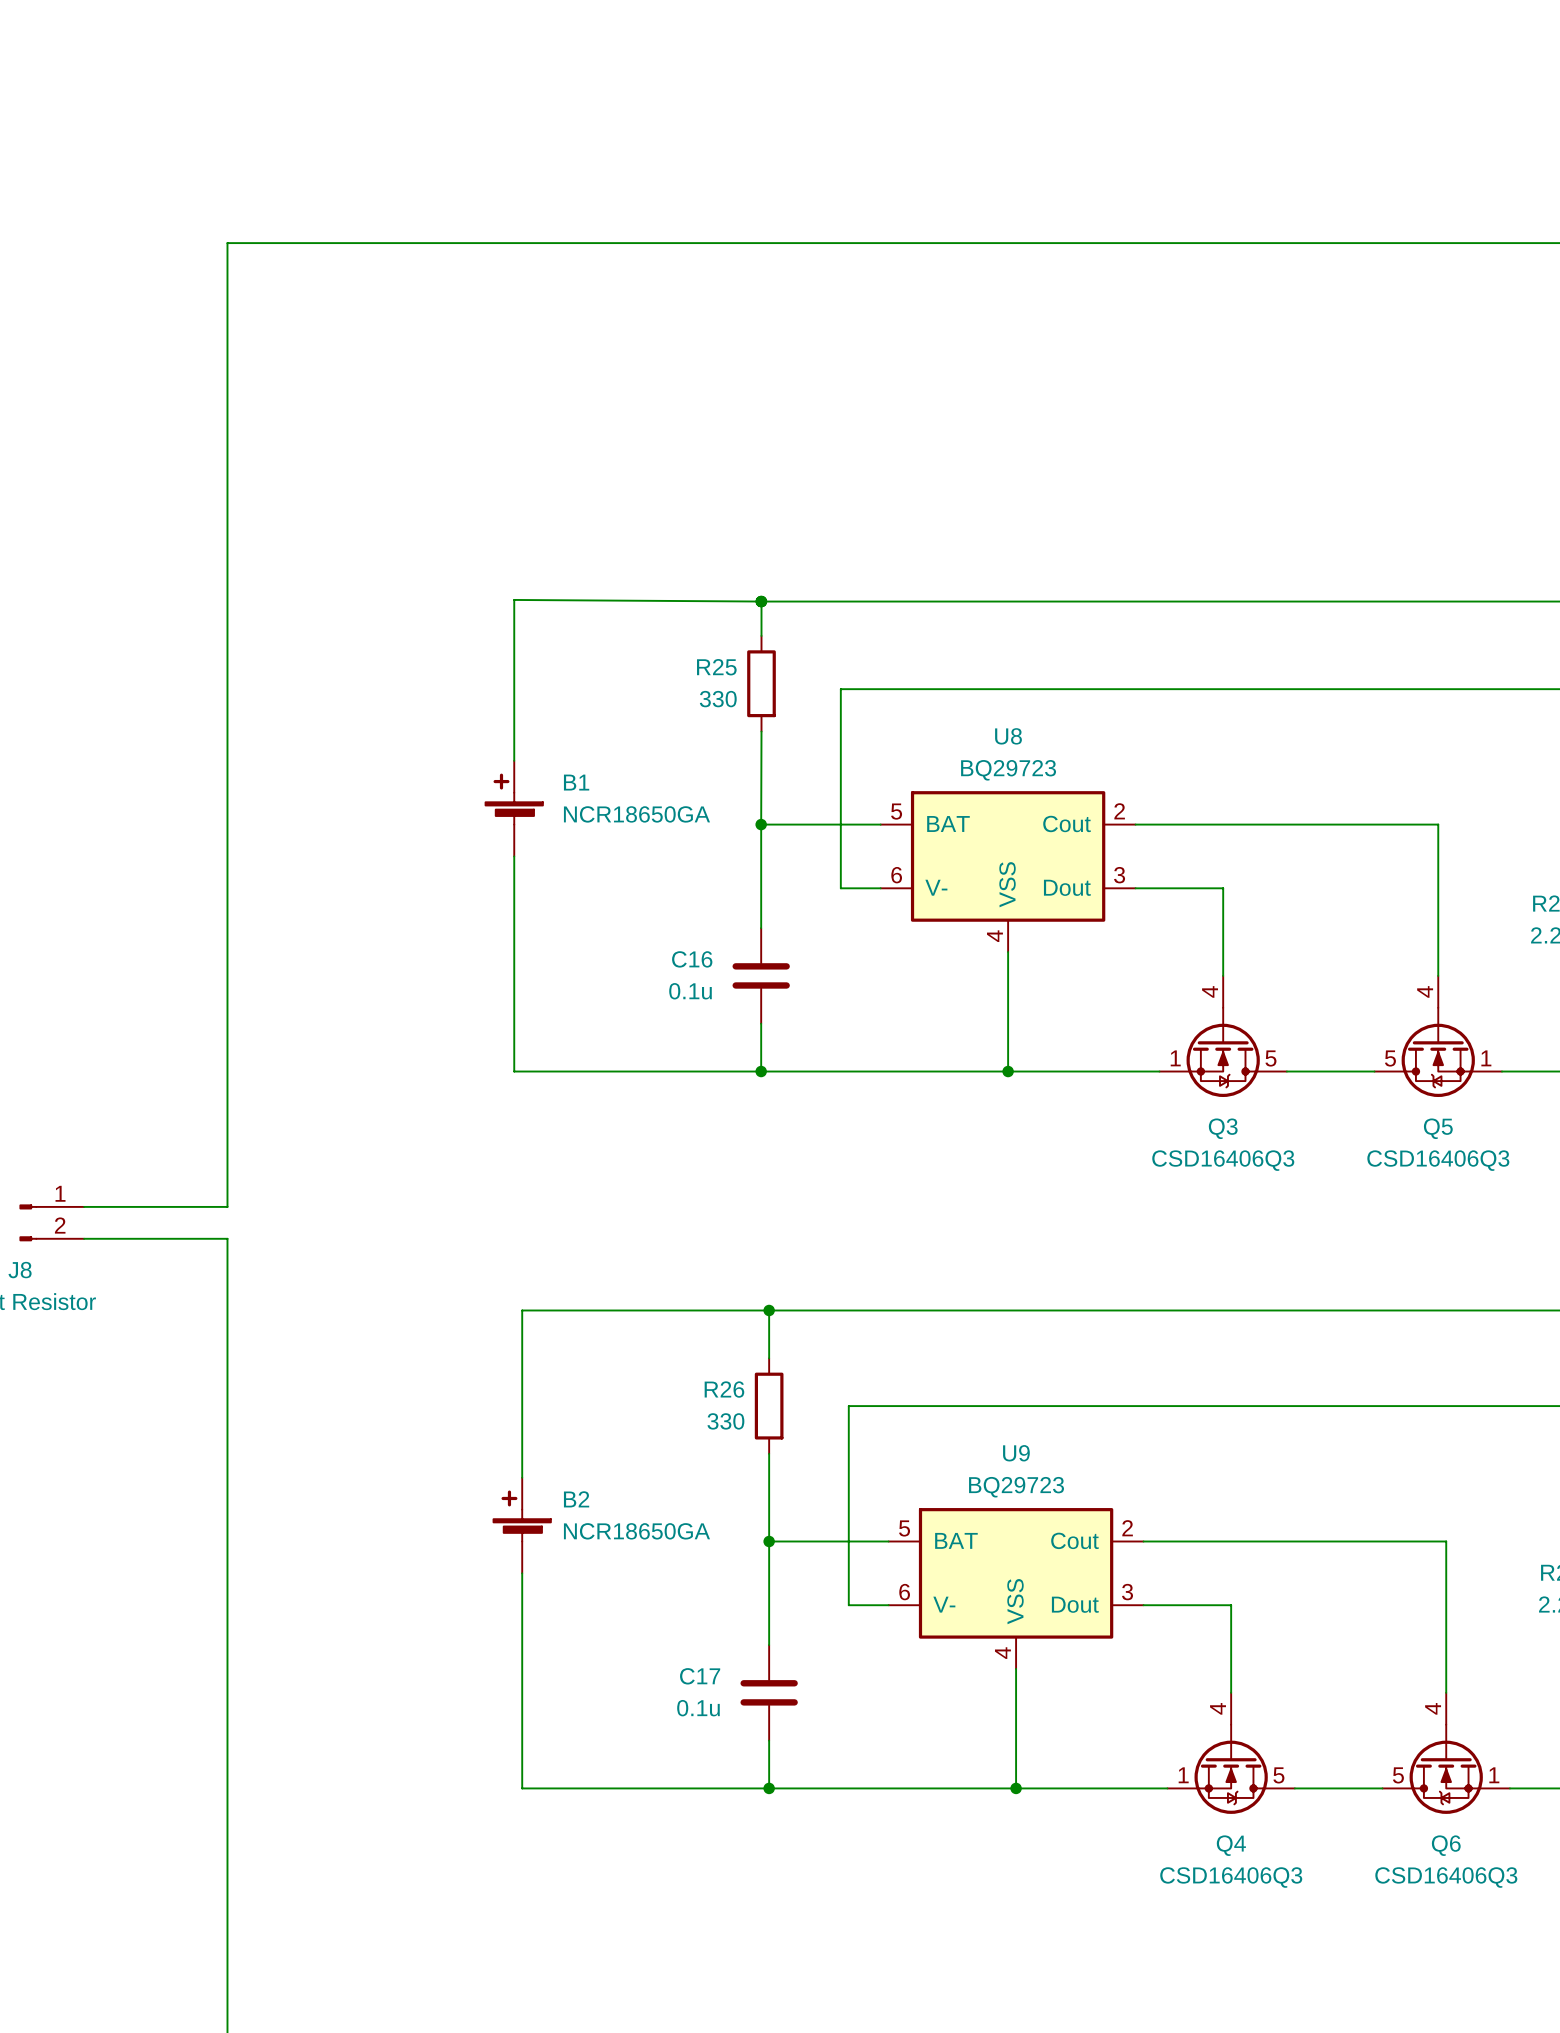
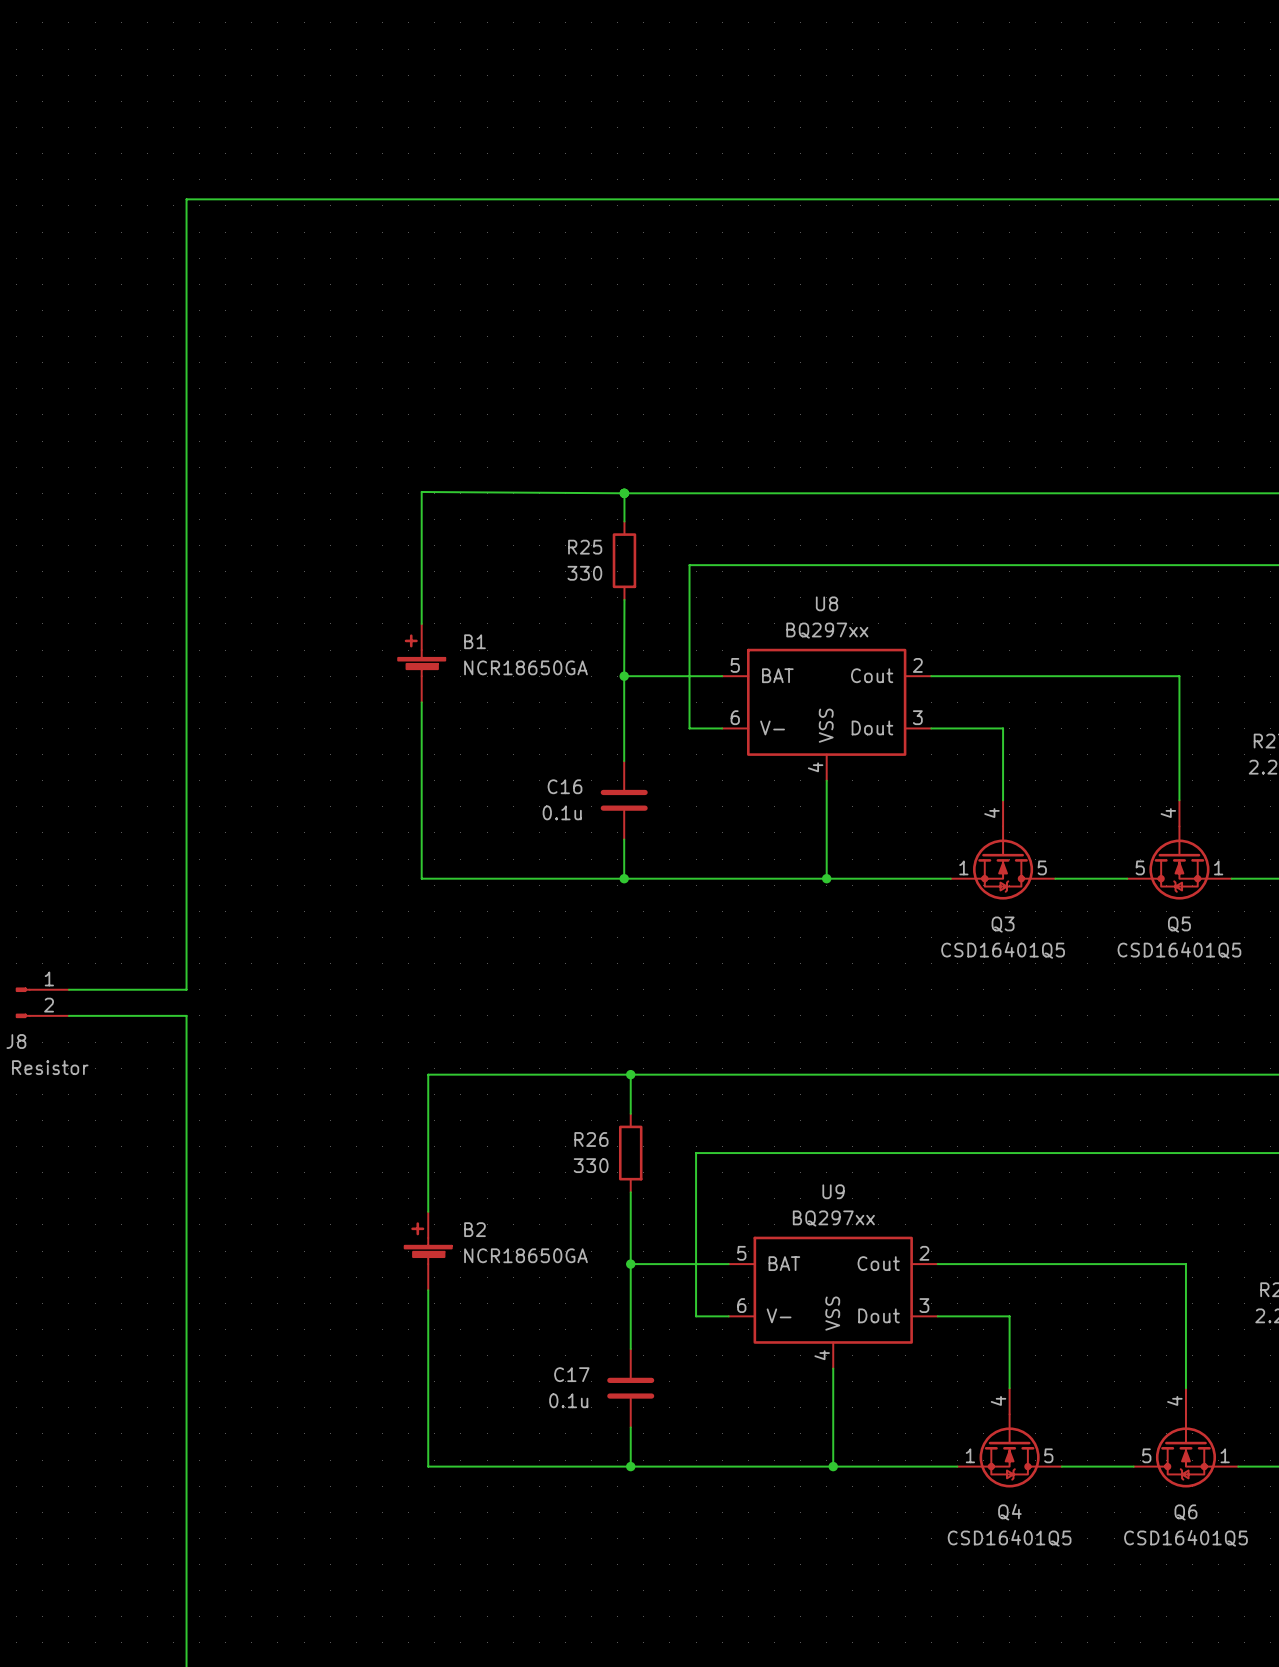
U8 value: BQ29723 (1008, 770) -> BQ297xx (827, 630)
Q3 value: CSD16406Q3 (1223, 1160) -> CSD16401Q5 (1003, 950)
Q5 value: CSD16406Q3 (1438, 1160) -> CSD16401Q5 (1179, 950)
U9 value: BQ29723 (1016, 1487) -> BQ297xx (833, 1218)
Q4 value: CSD16406Q3 (1231, 1877) -> CSD16401Q5 (1009, 1538)
Q6 value: CSD16406Q3 (1446, 1877) -> CSD16401Q5 (1185, 1538)

